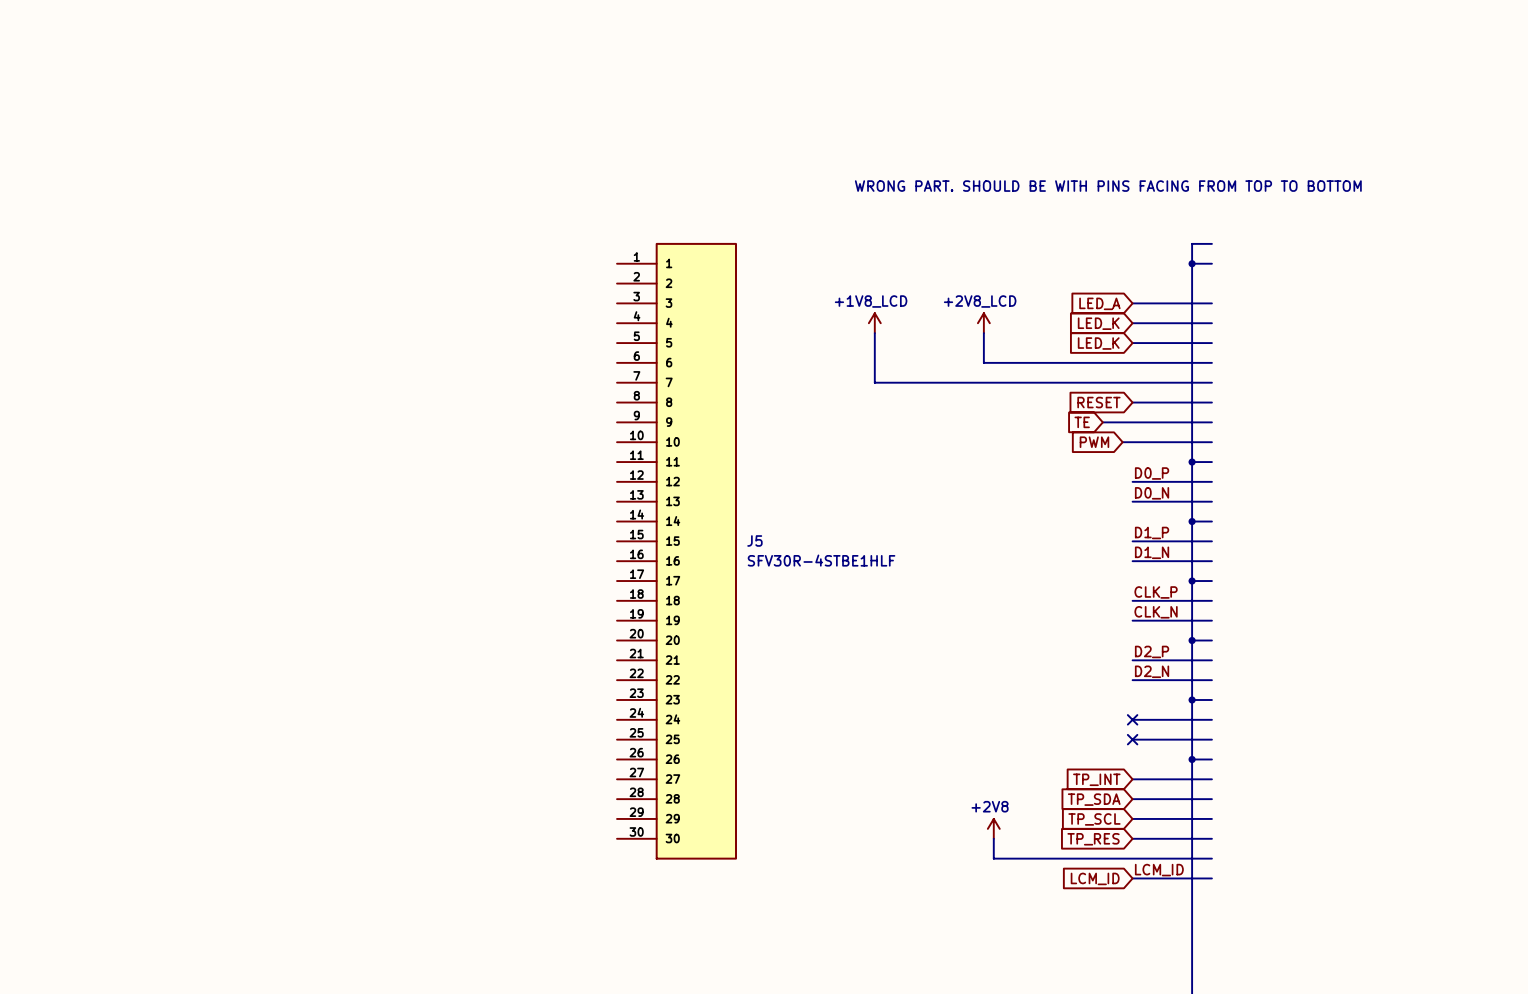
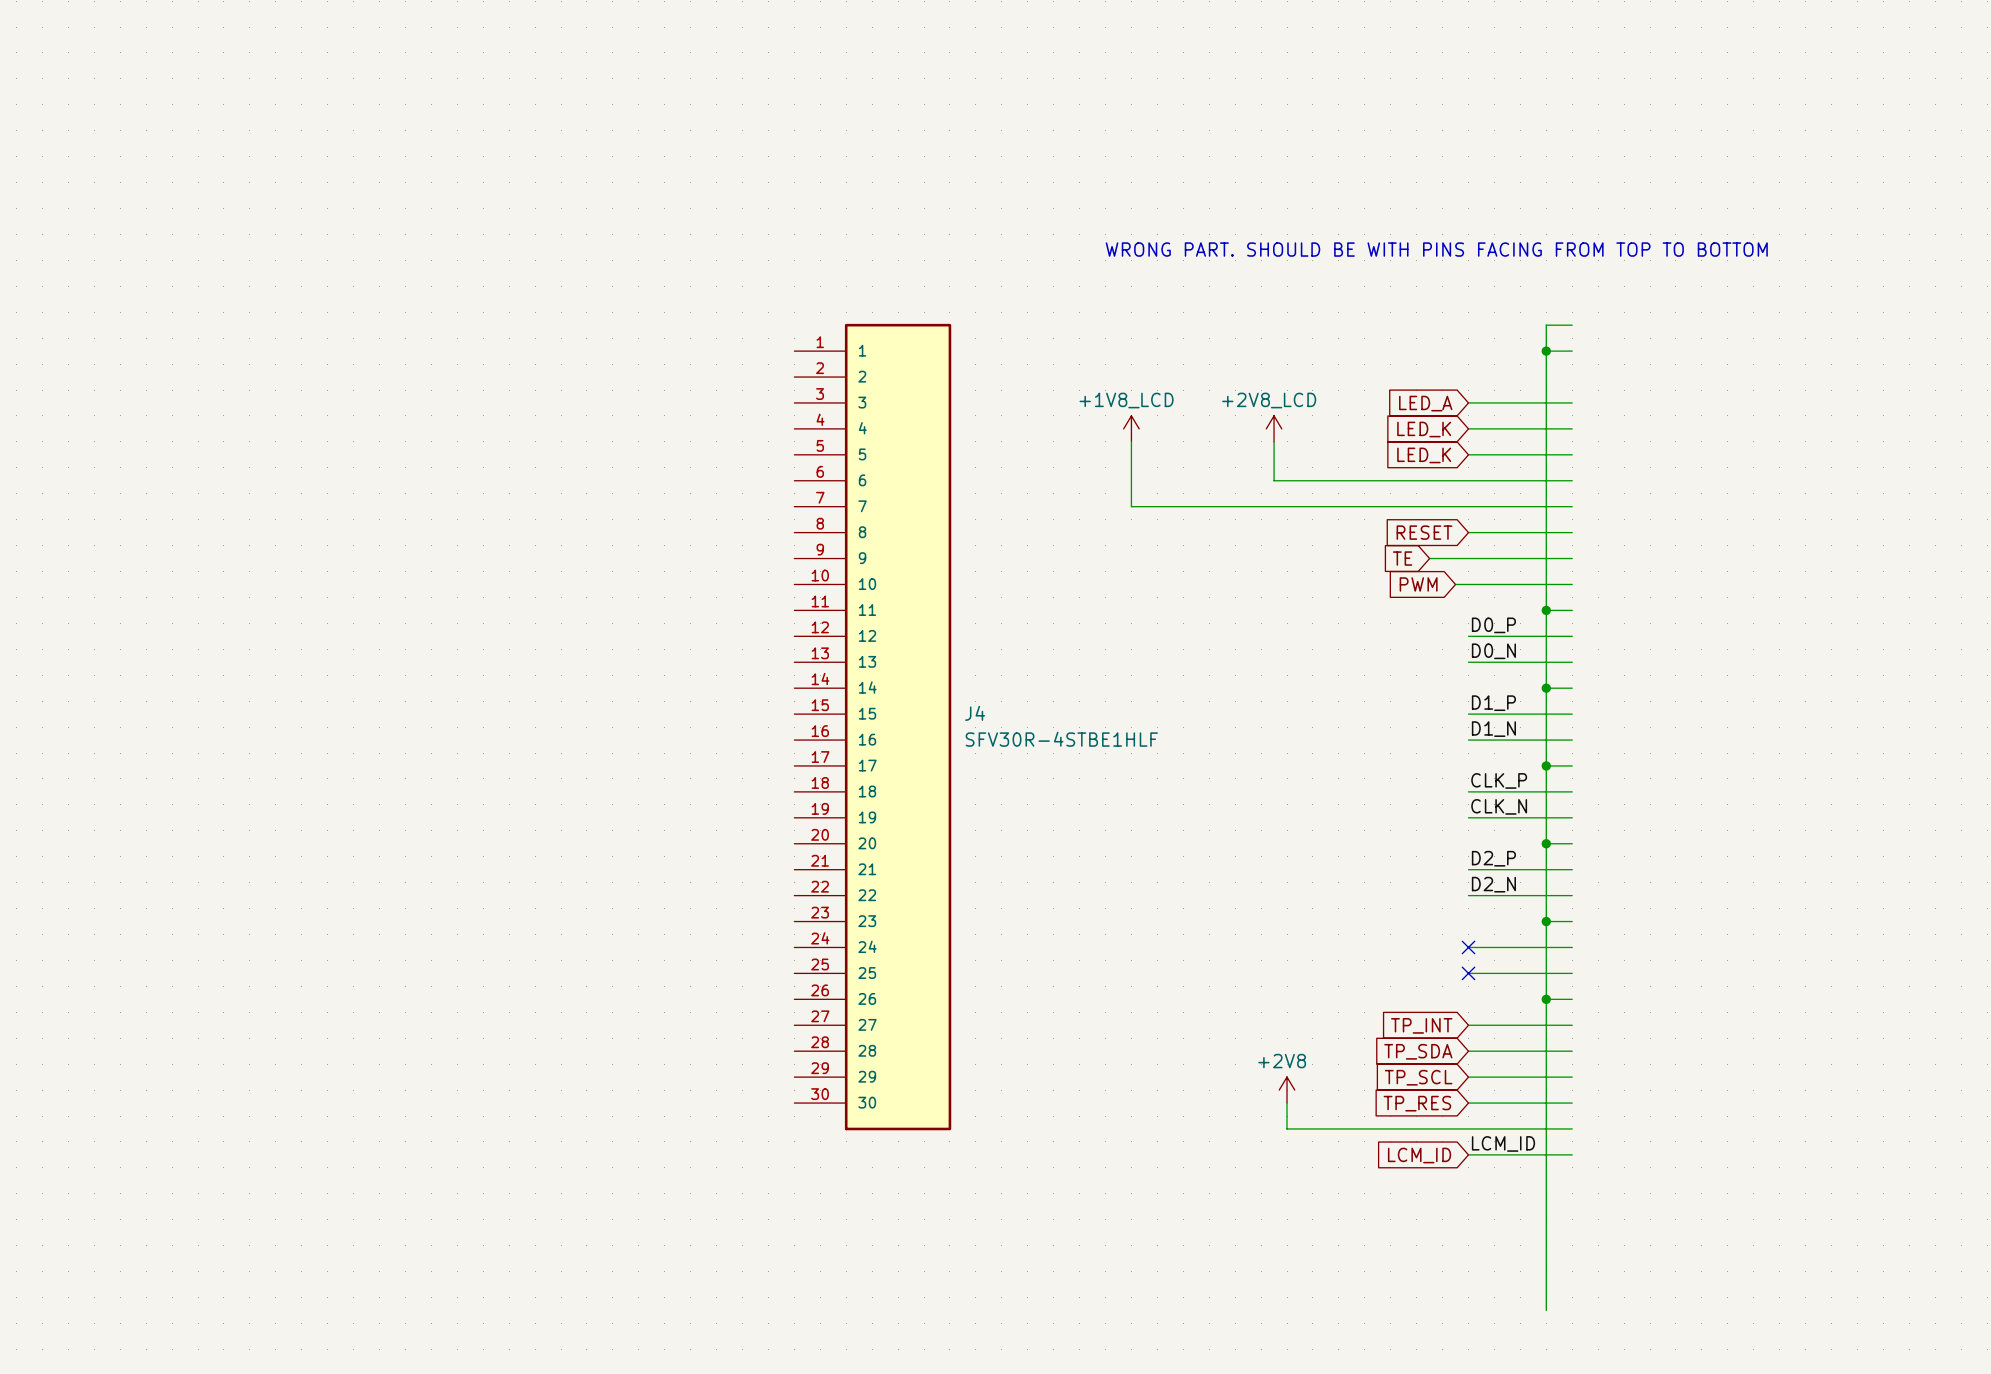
J5 name: J5 (754, 540) -> J4 (975, 713)

